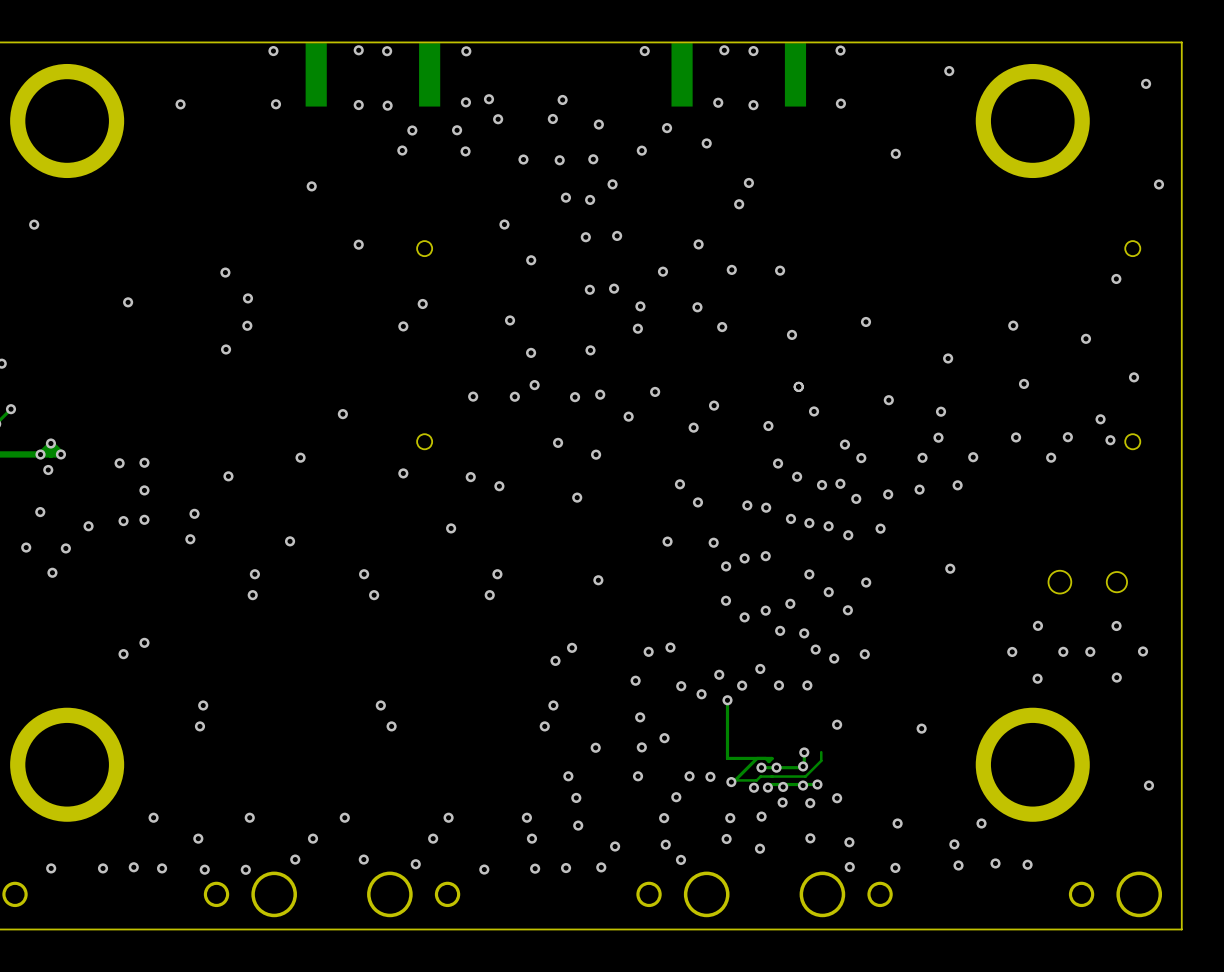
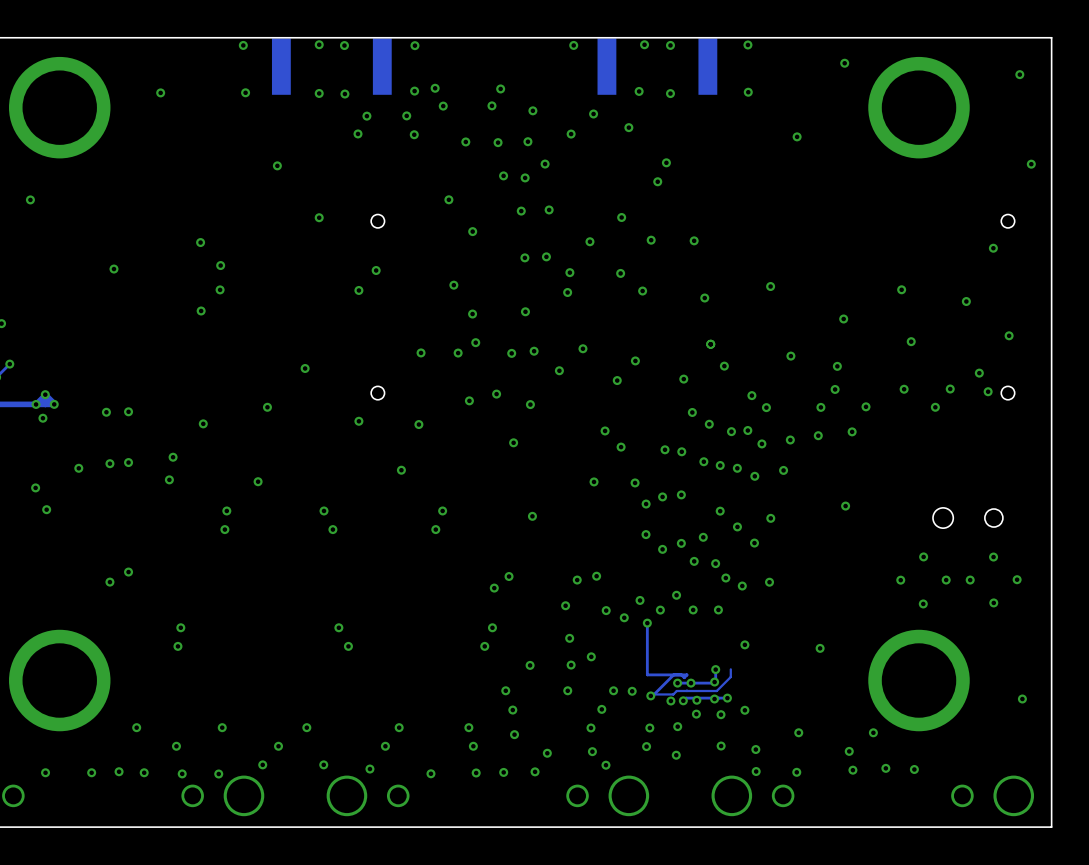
via position: (499, 486) -> (469, 400)
via: (144, 490) -> none
via: (40, 512) -> none
via: (26, 547) -> none
via: none -> (35, 487)
via: (65, 548) -> none

